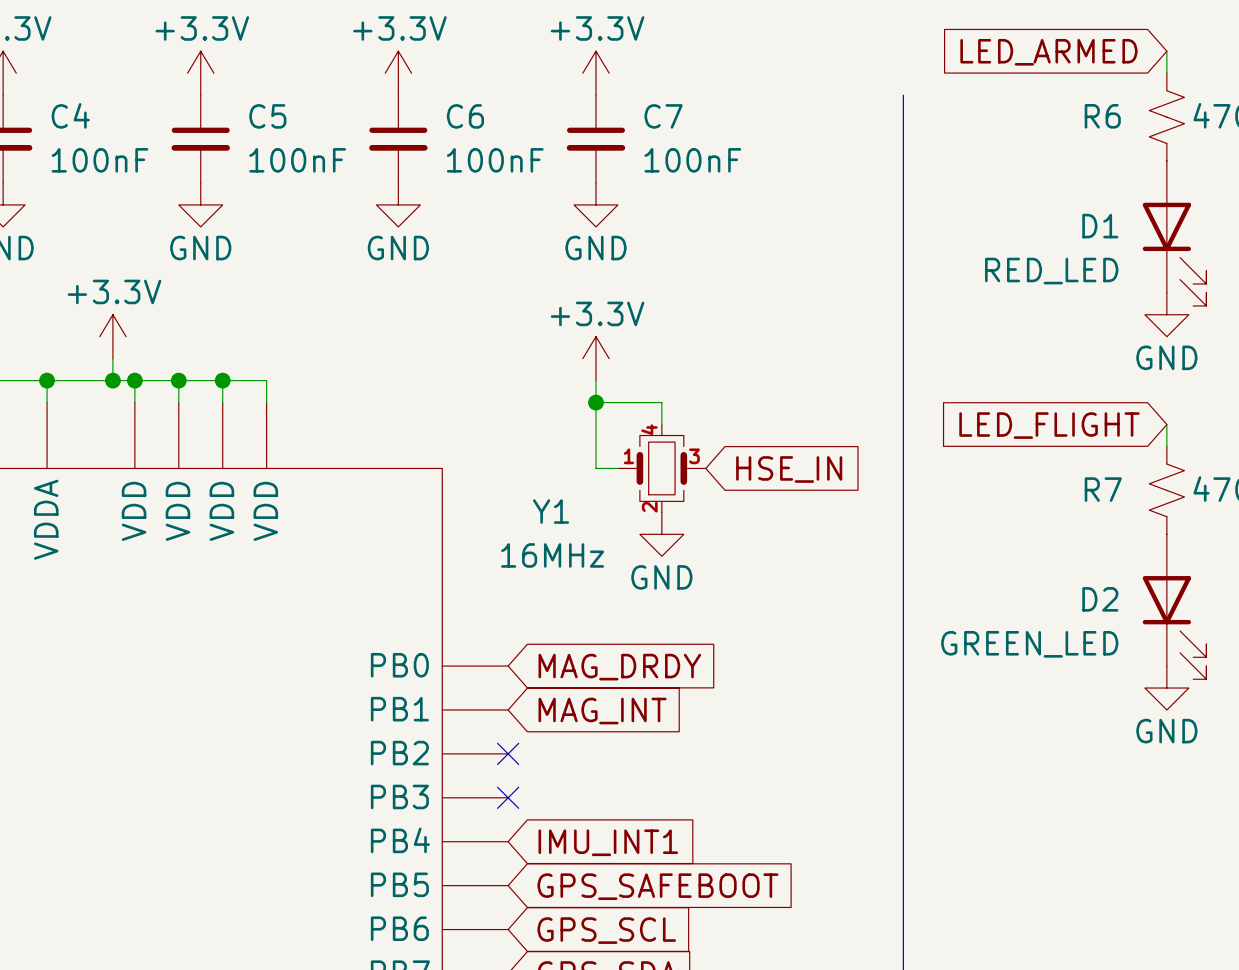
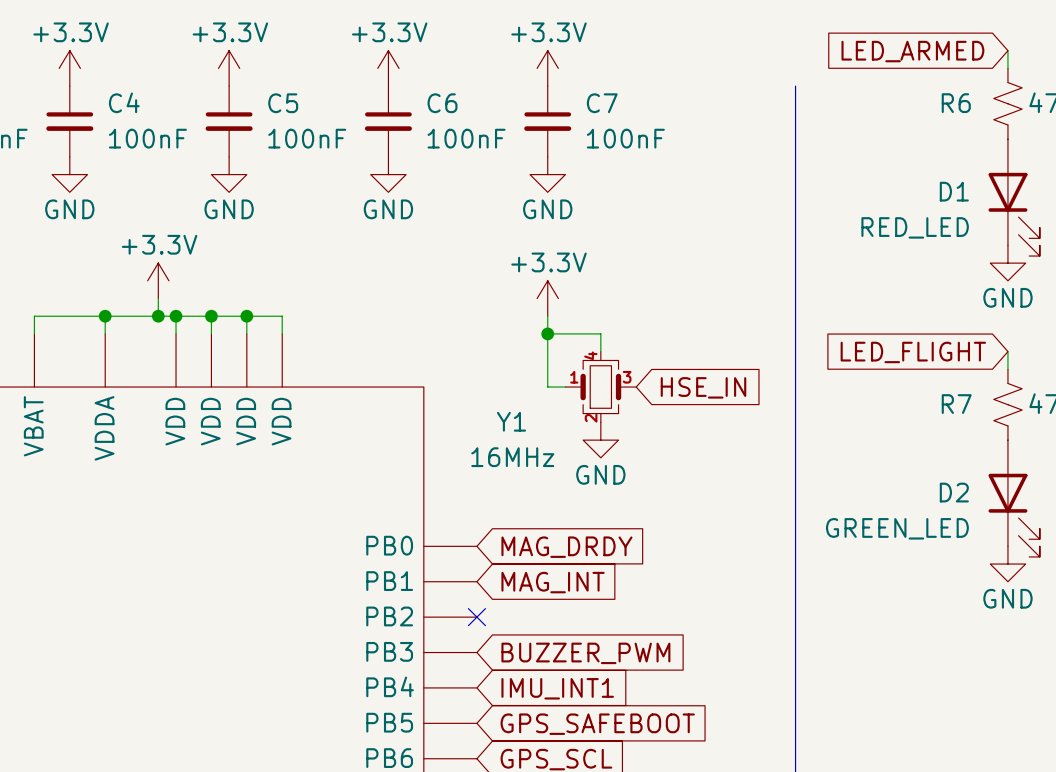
no-connect mark: (508, 797) -> none
global label: none -> BUZZER_PWM (585, 653)

